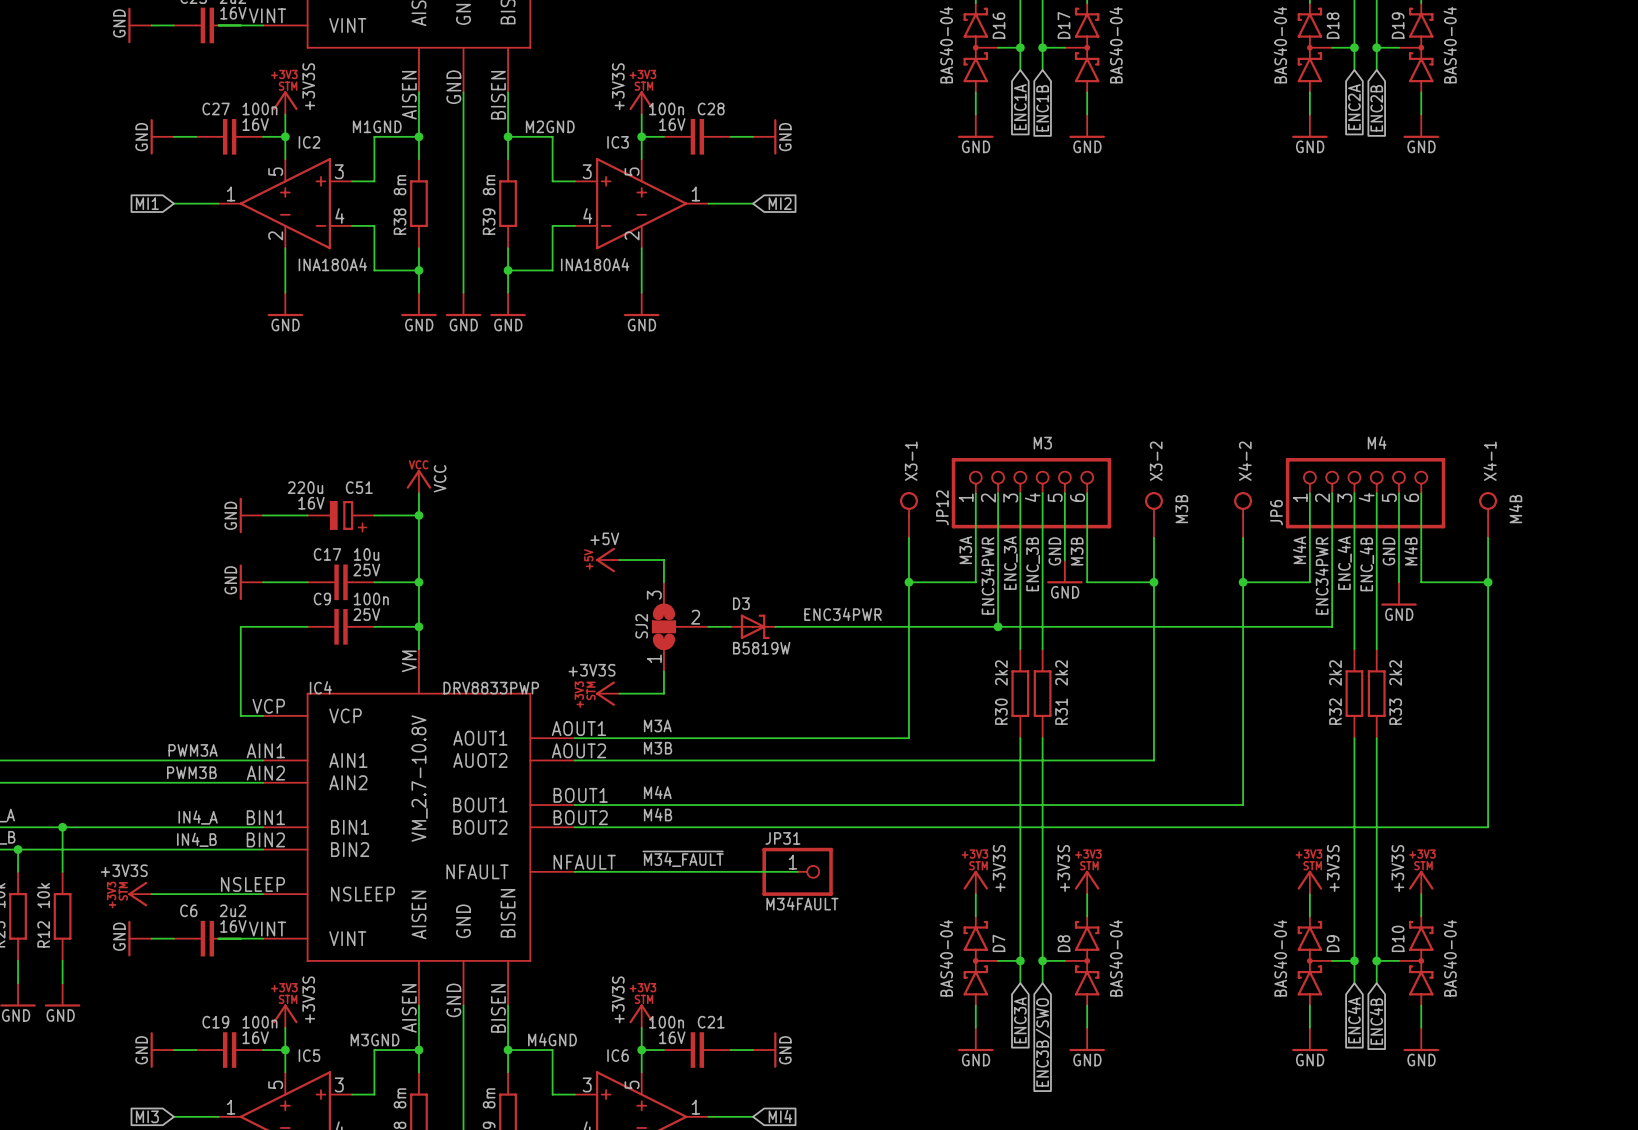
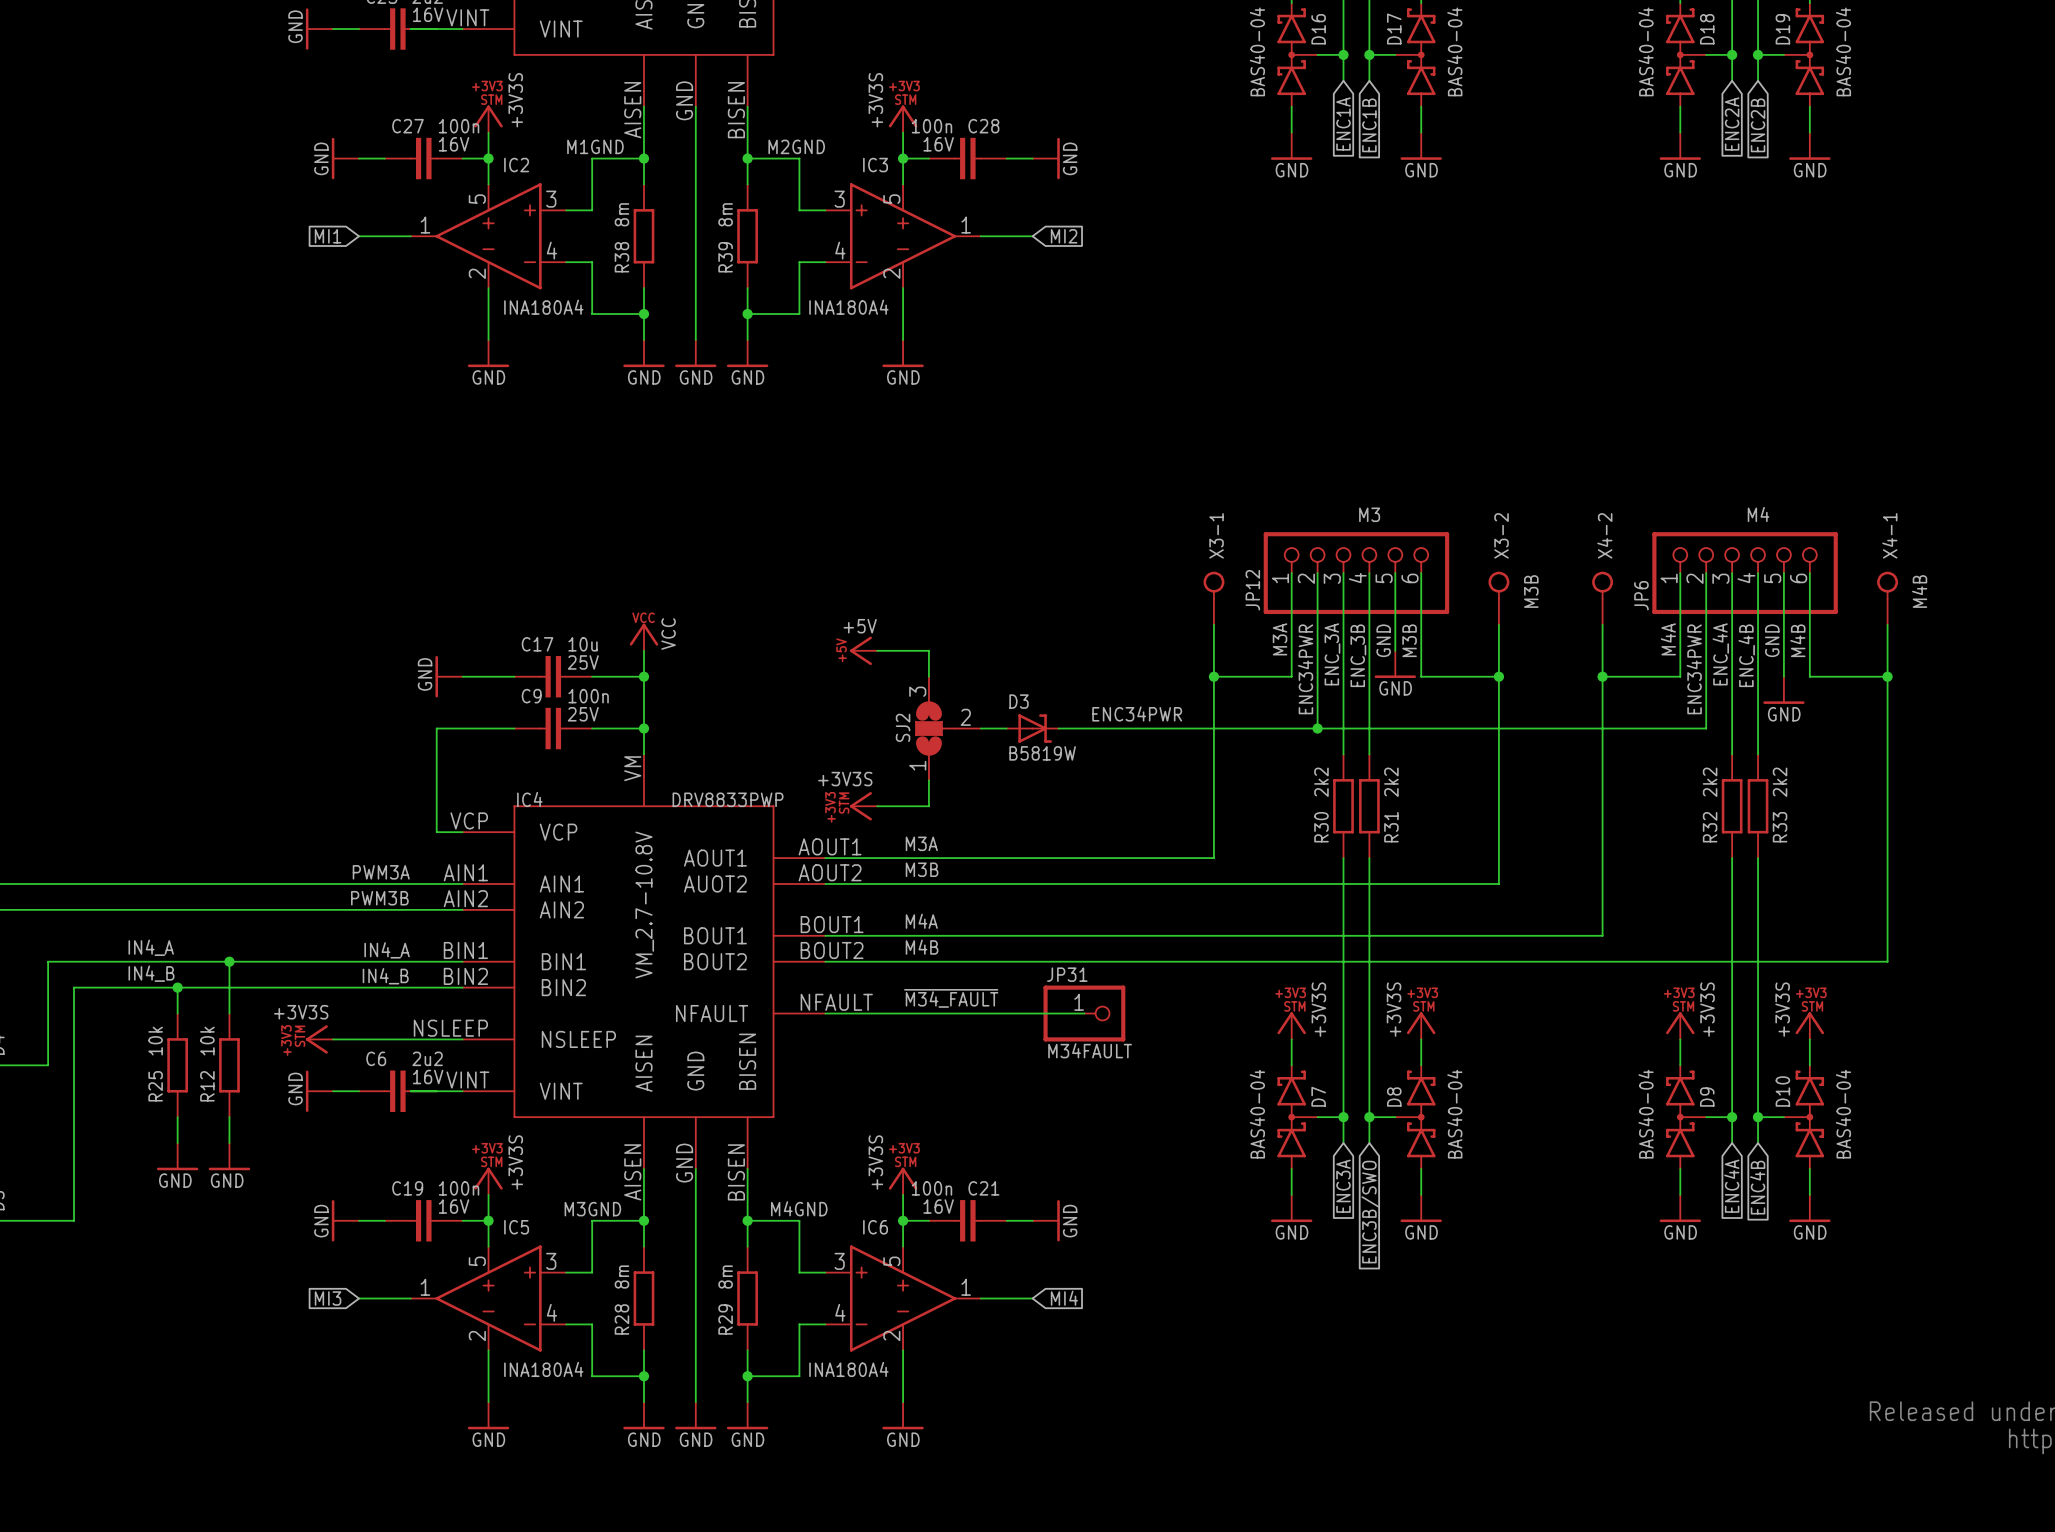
power symbol position: VCC (418, 481) -> VCC (643, 637)
wire: (418, 493) (418, 560) -> none
power symbol: GND (251, 515) -> none
wire: (263, 515) (307, 515) -> none
C51: 220u (341, 515) -> none
wire: (374, 515) (418, 515) -> none
junction: (418, 515) -> none

